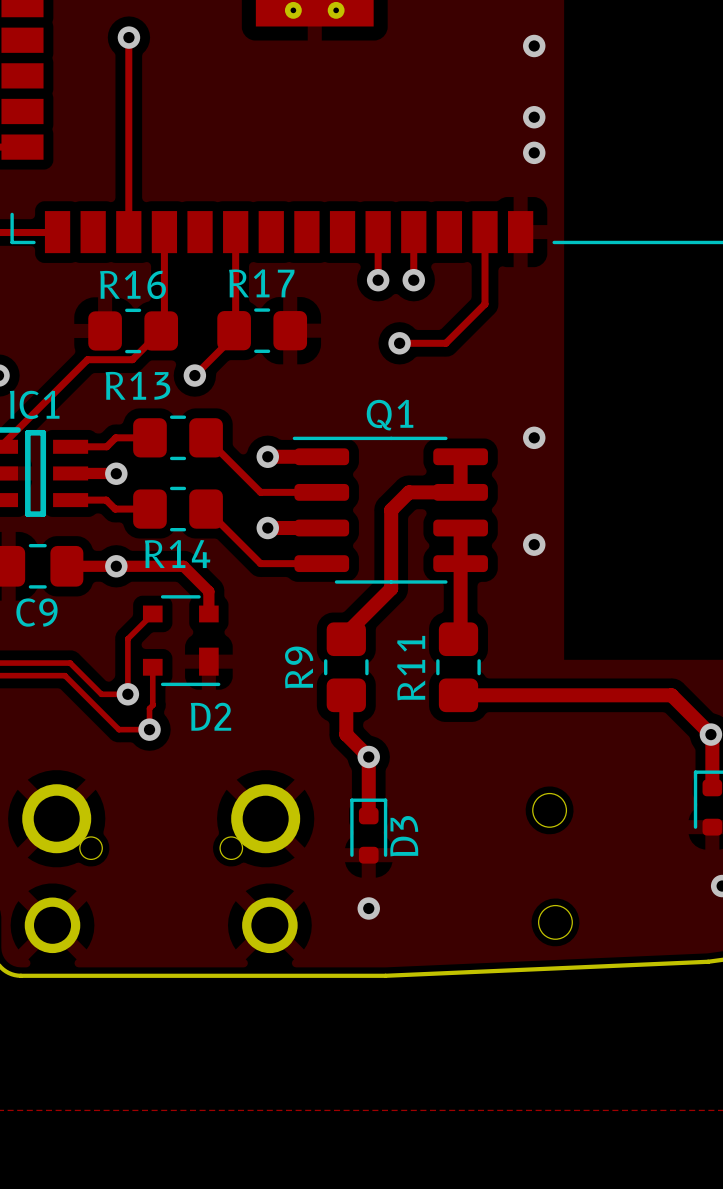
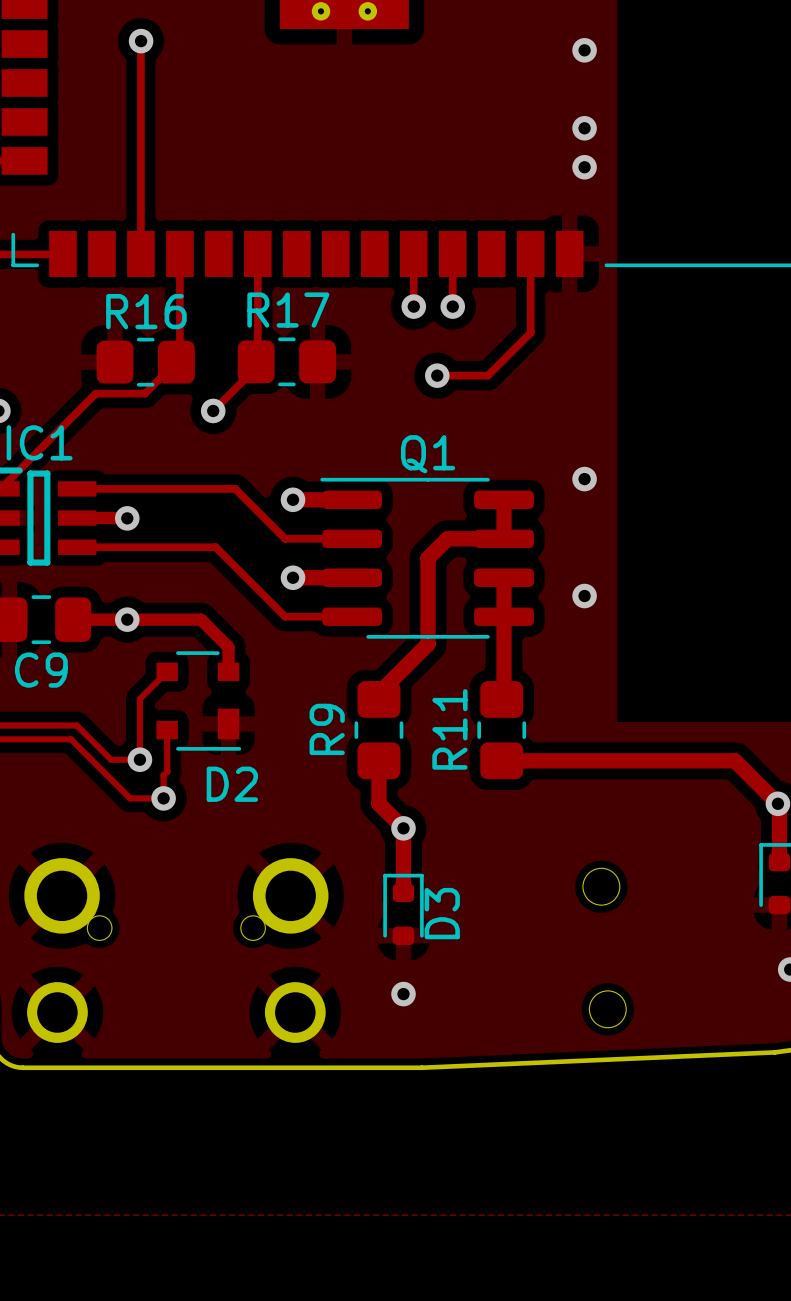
track: (149, 437) (115, 437) (106, 446) -> (235, 488) (116, 488)
R13: (178, 437) -> none
track: (106, 500) (115, 509) (149, 509) -> (116, 547) (215, 547) (225, 557)
R14: (178, 509) -> none

